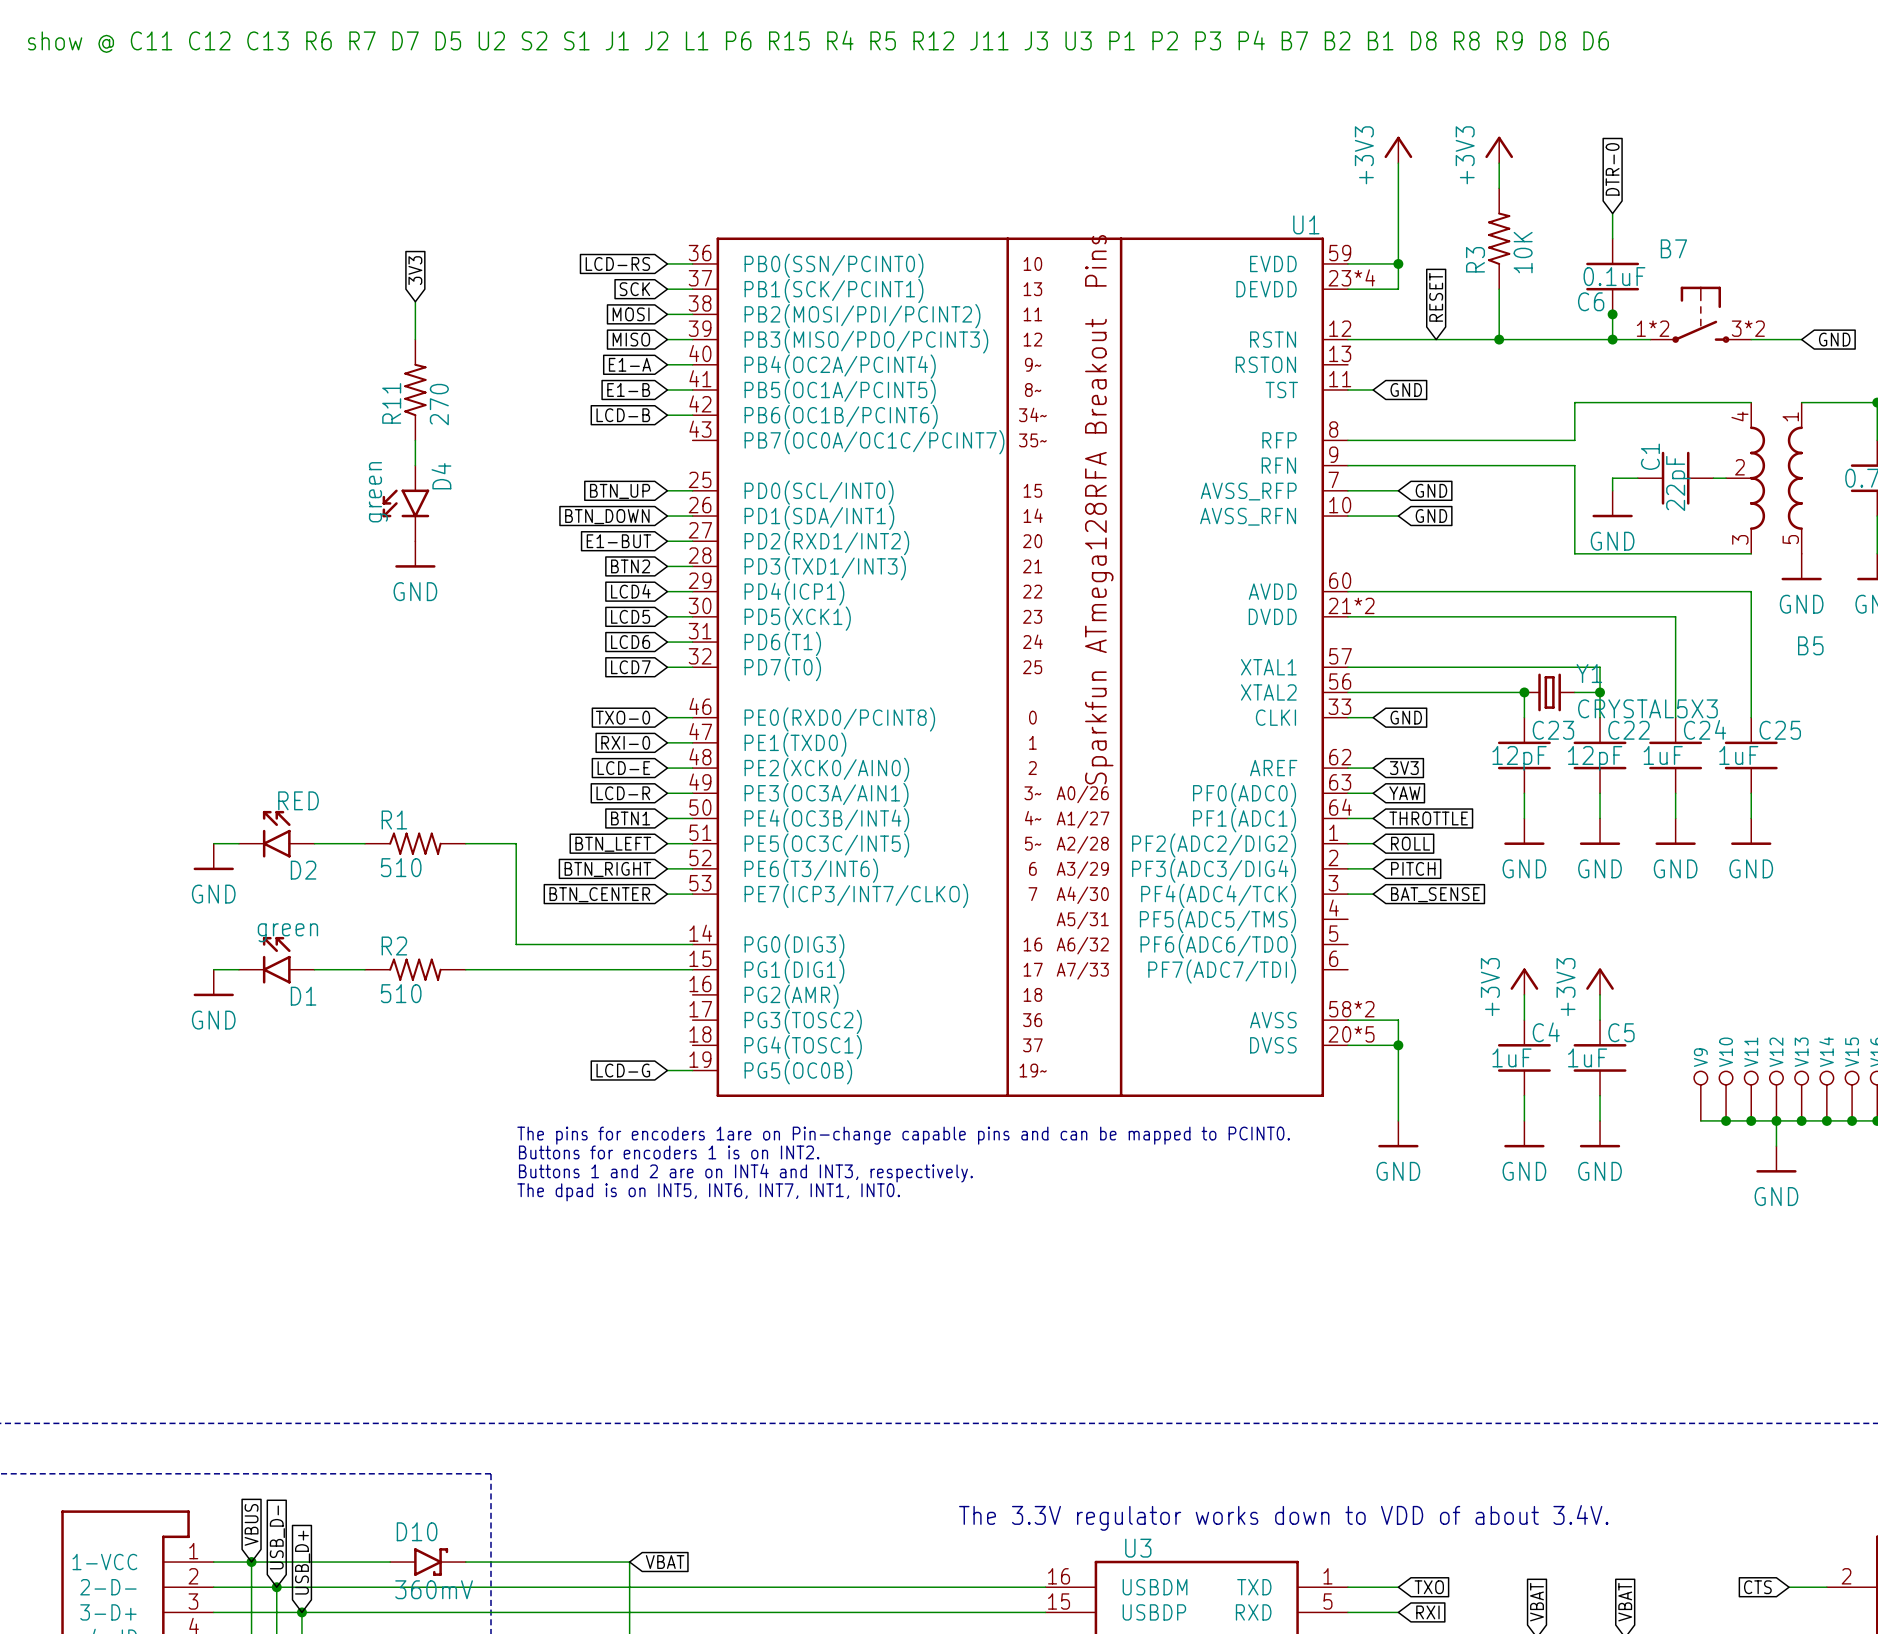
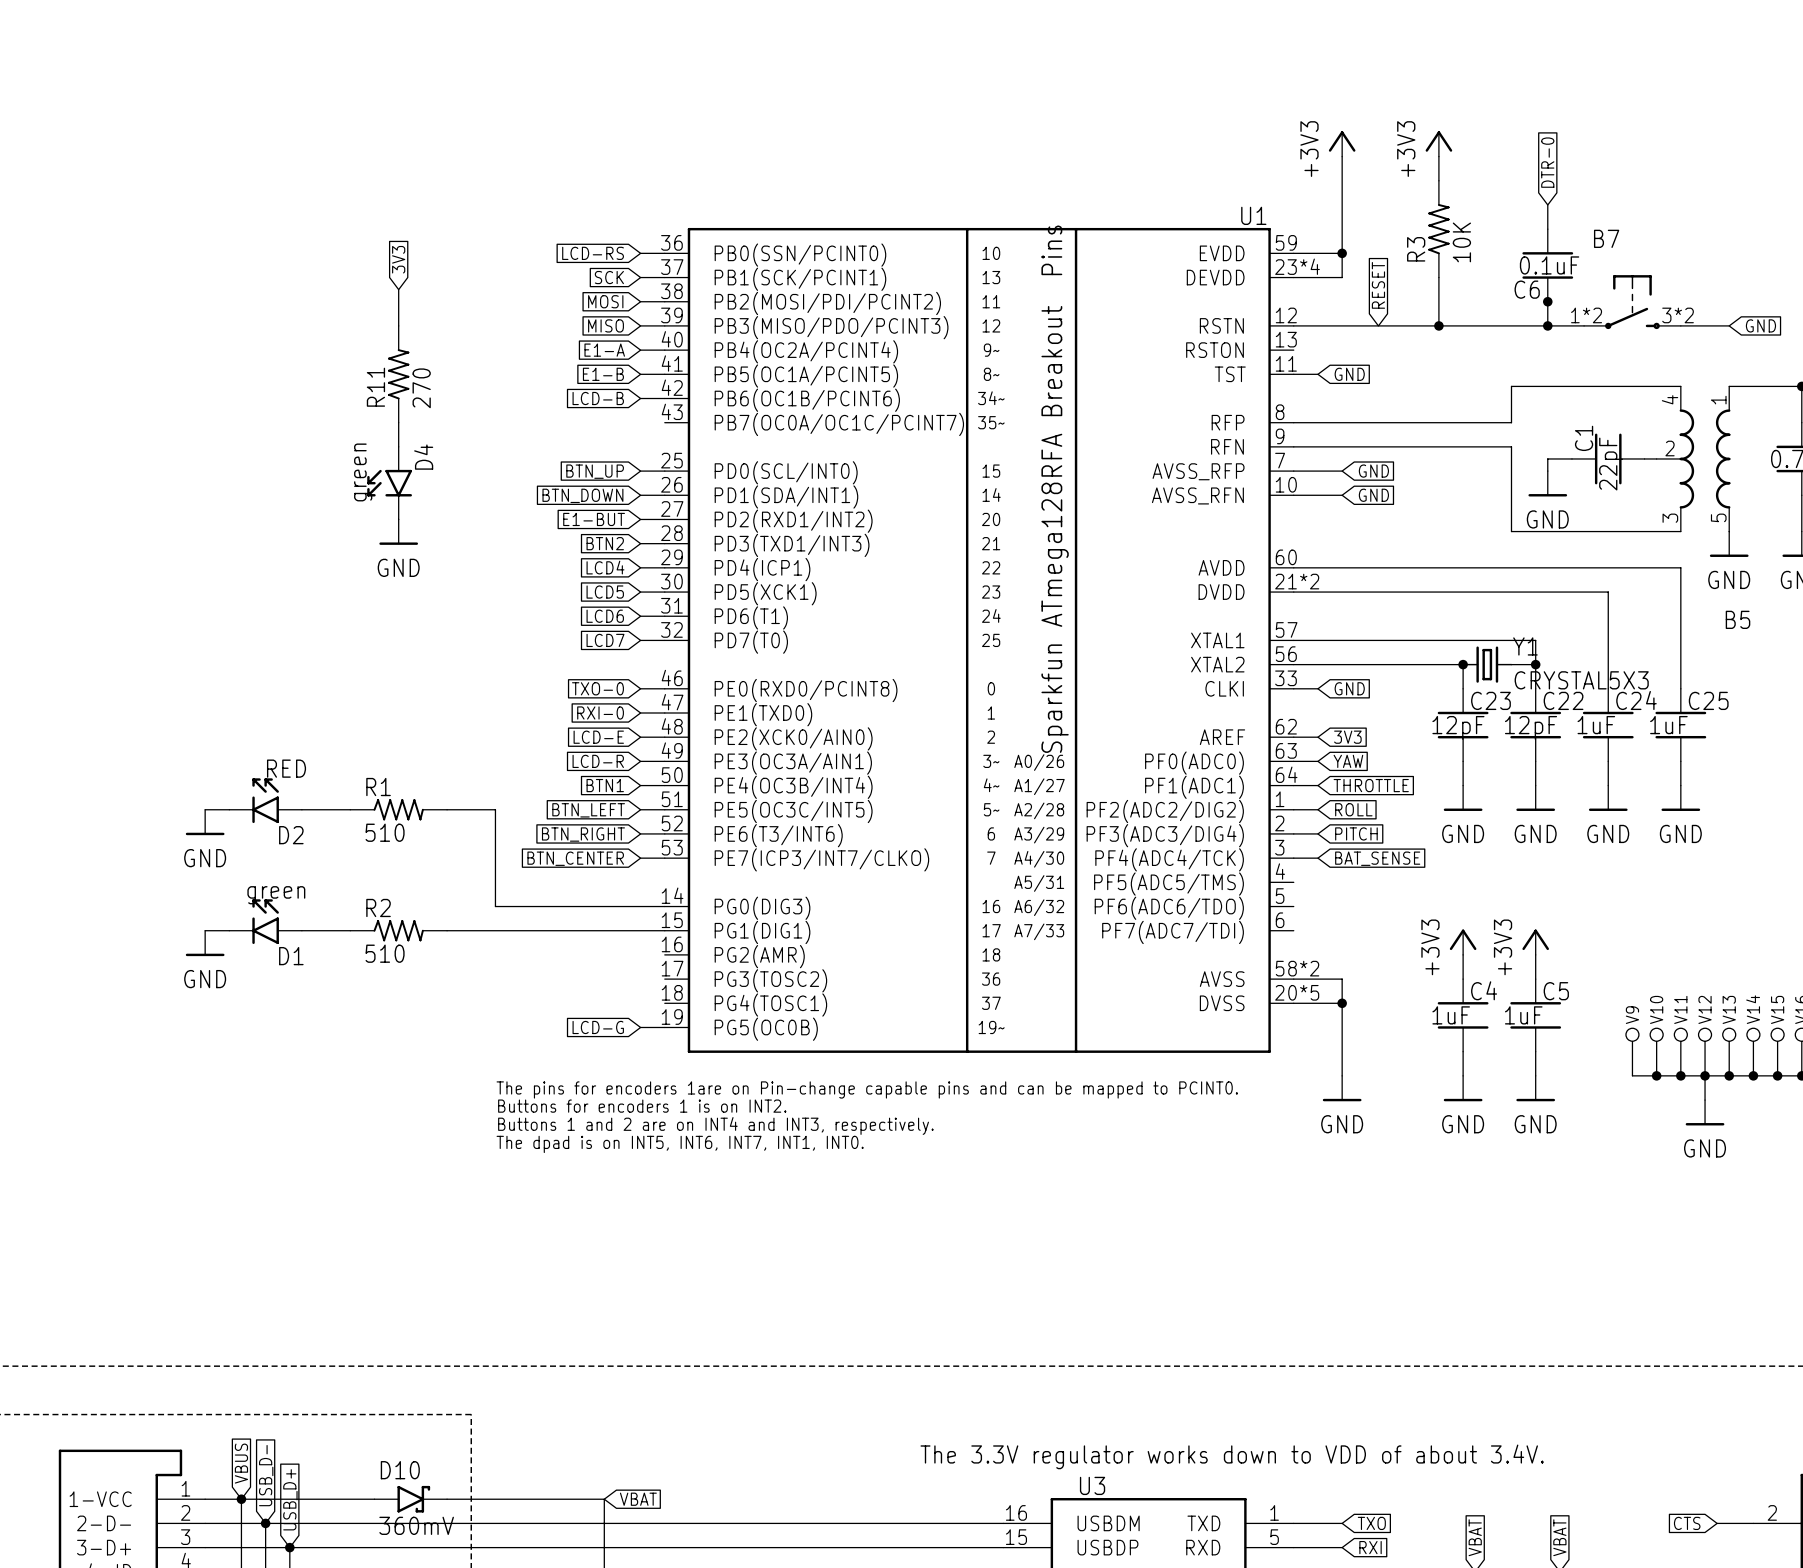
text: show @ C11 C12 C13 R6 R7 D7 D5 U2 S2 S1 J1 J2 L1 P6 R15 R4 R5 R12 J11 J3 U3 P1 P2 P3 P4 B7 B2 B1 D8 R8 R9 D8 D6 (818, 41) -> none

